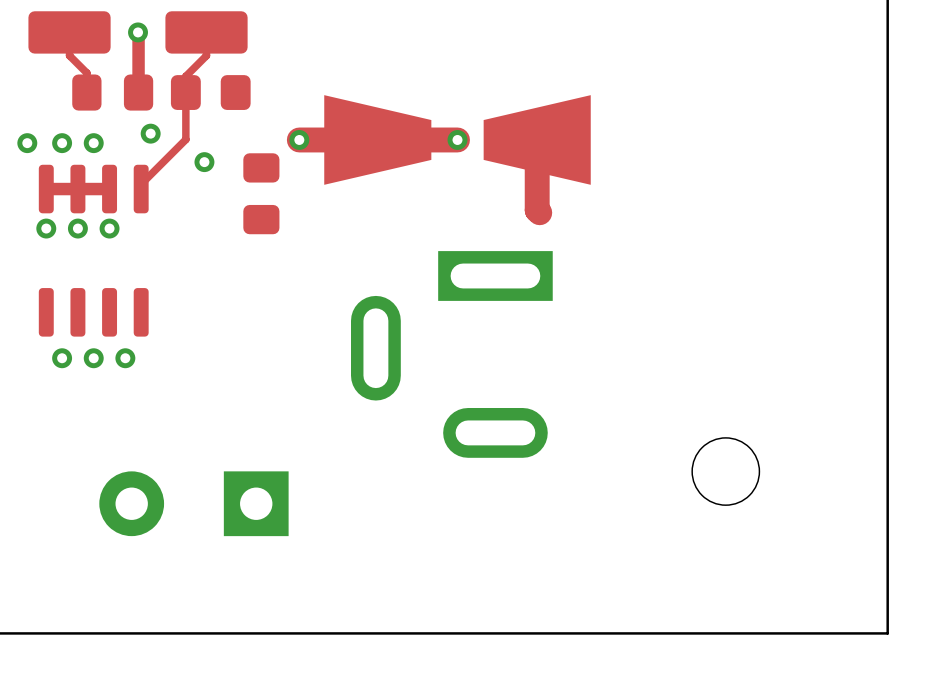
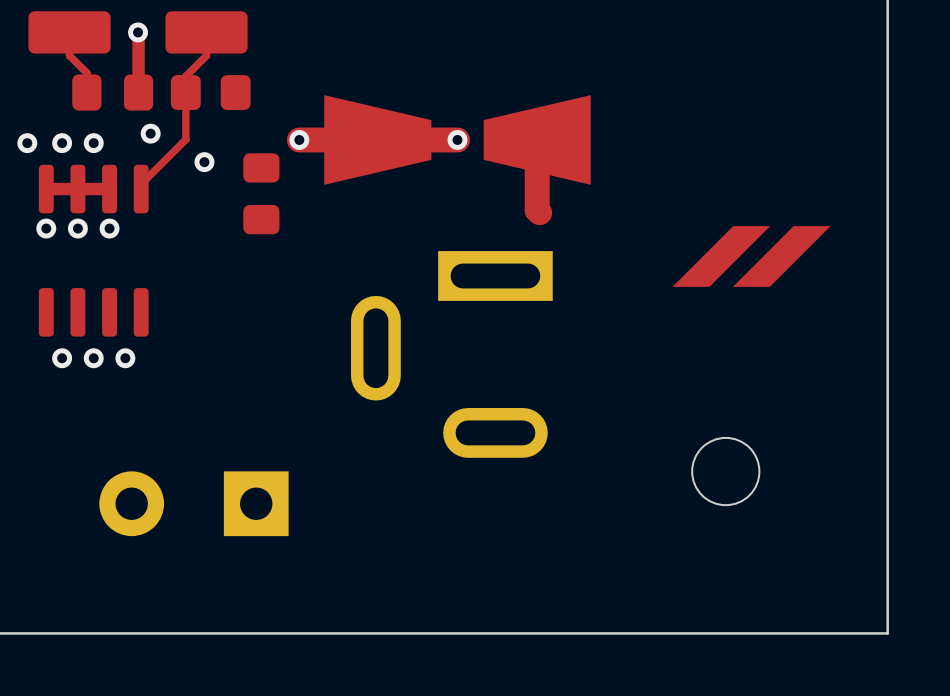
drawing: none -> [672, 226, 831, 287]

